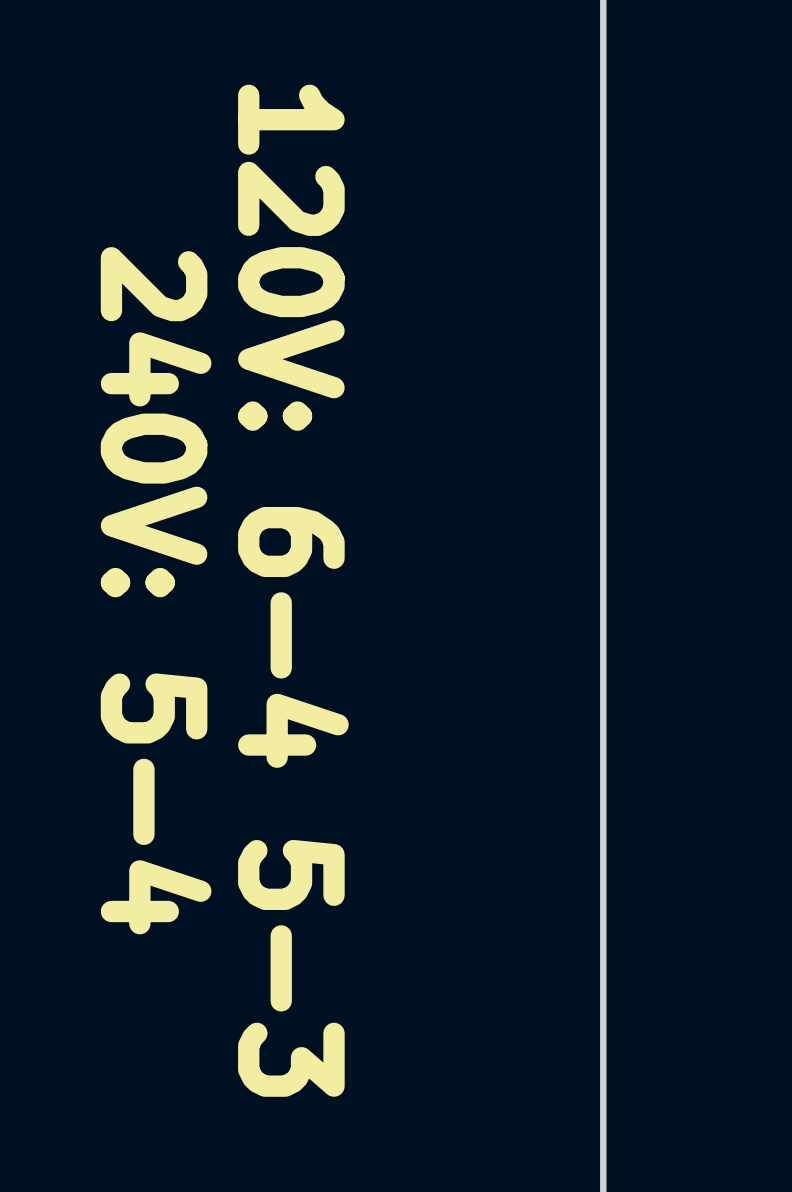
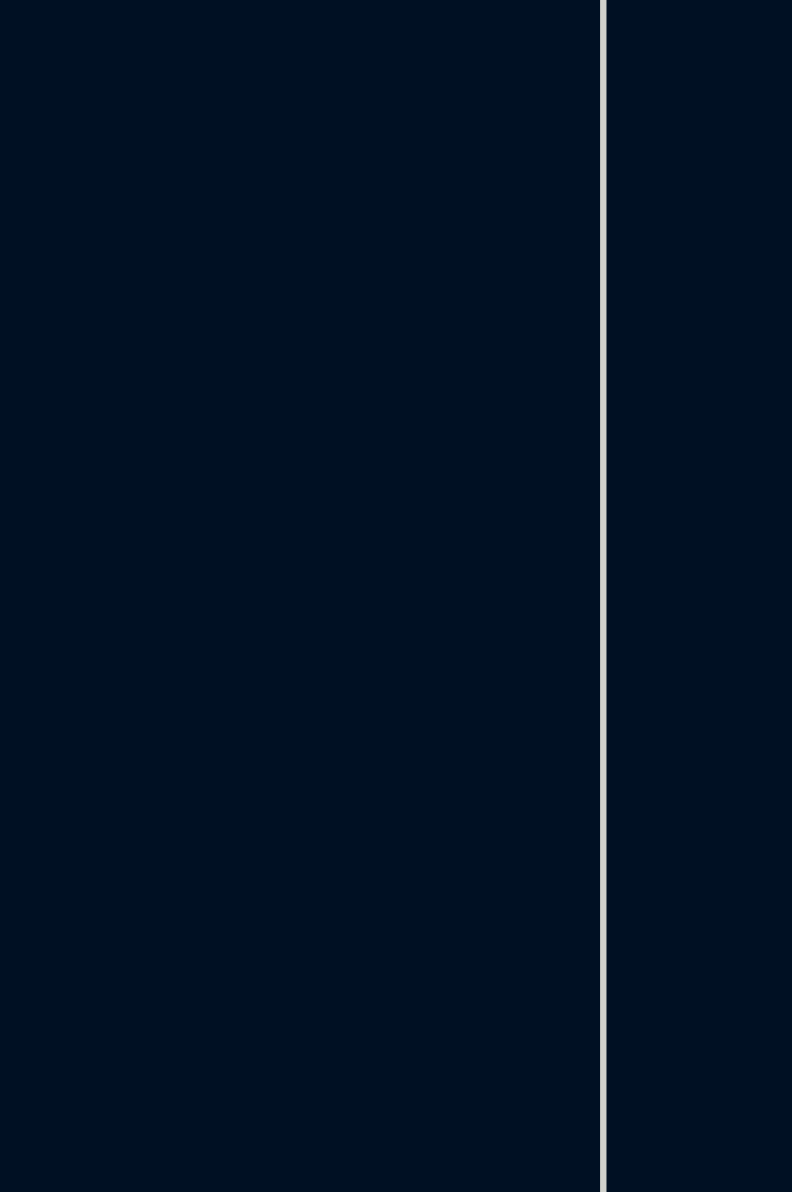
text: 240V: 5-4 (156, 590) -> none
text: 120V: 6-4 5-3 (293, 590) -> none

